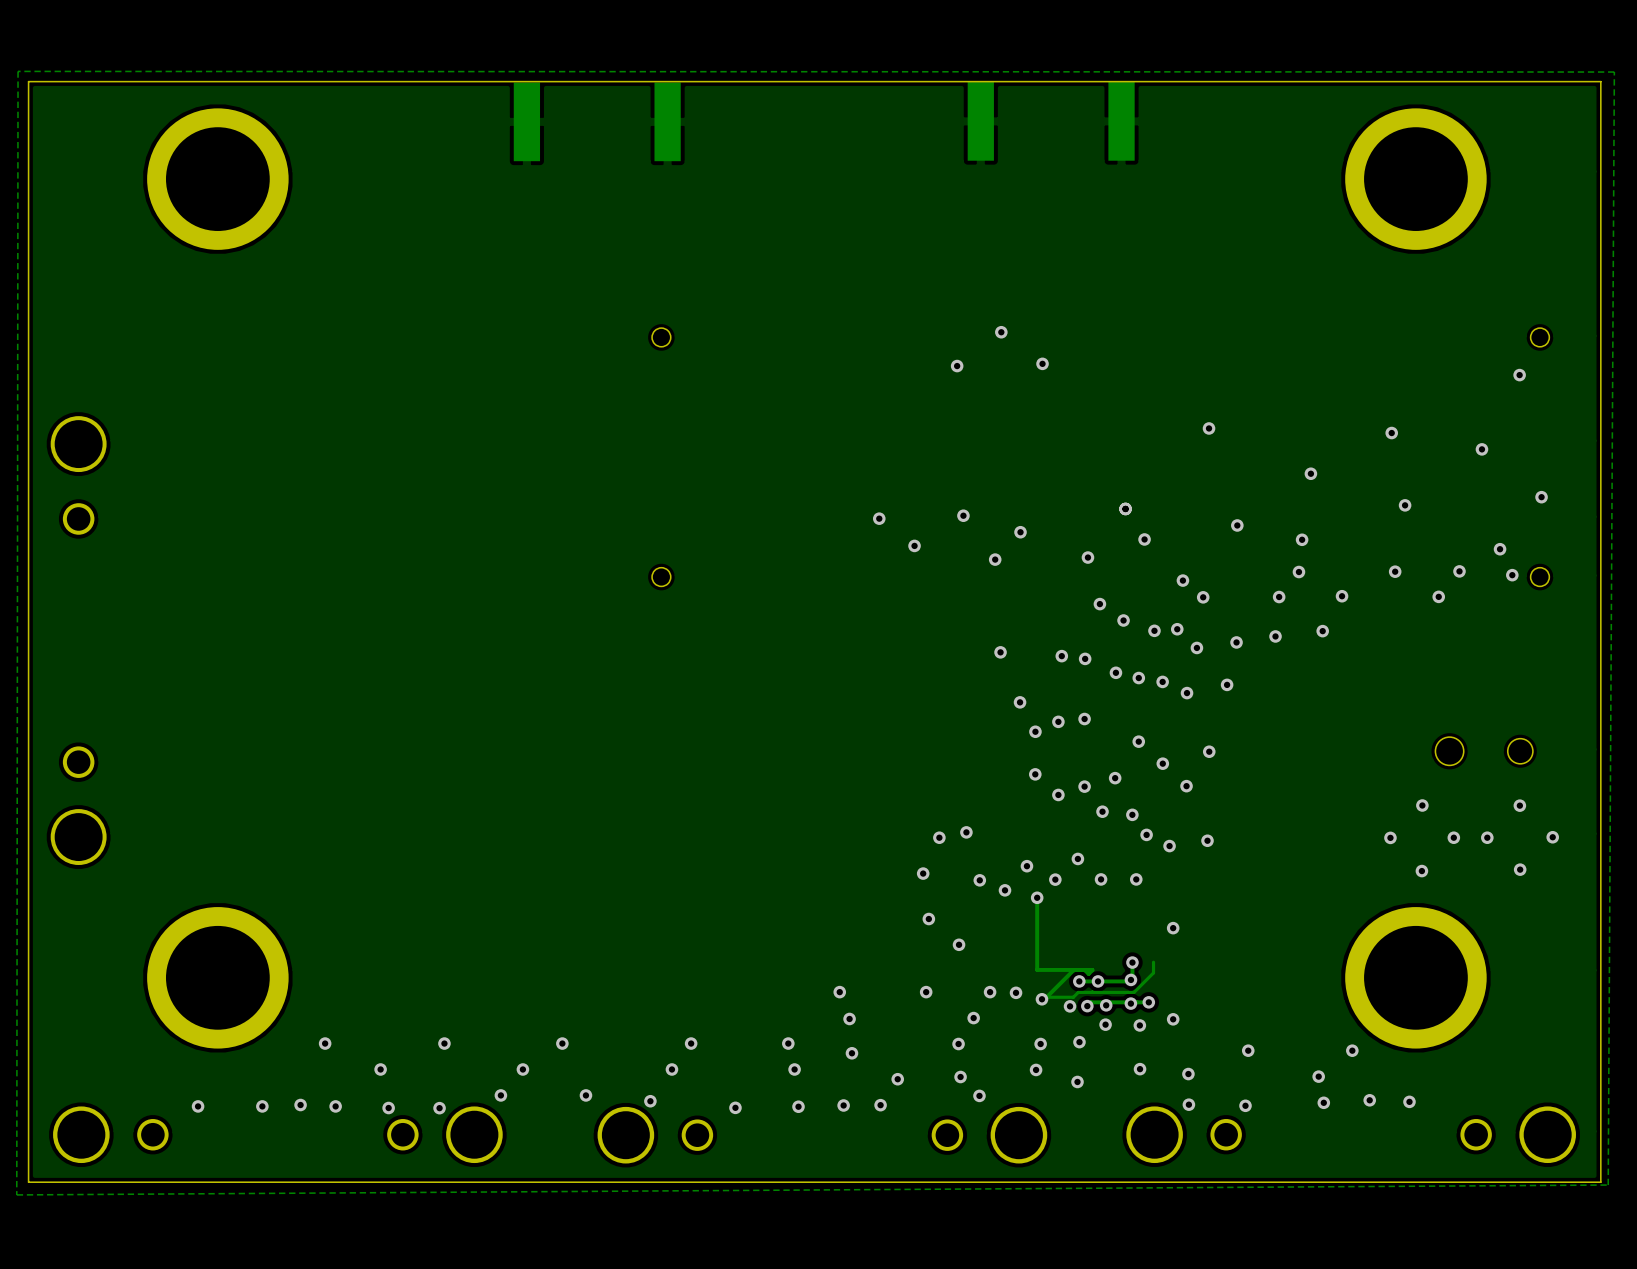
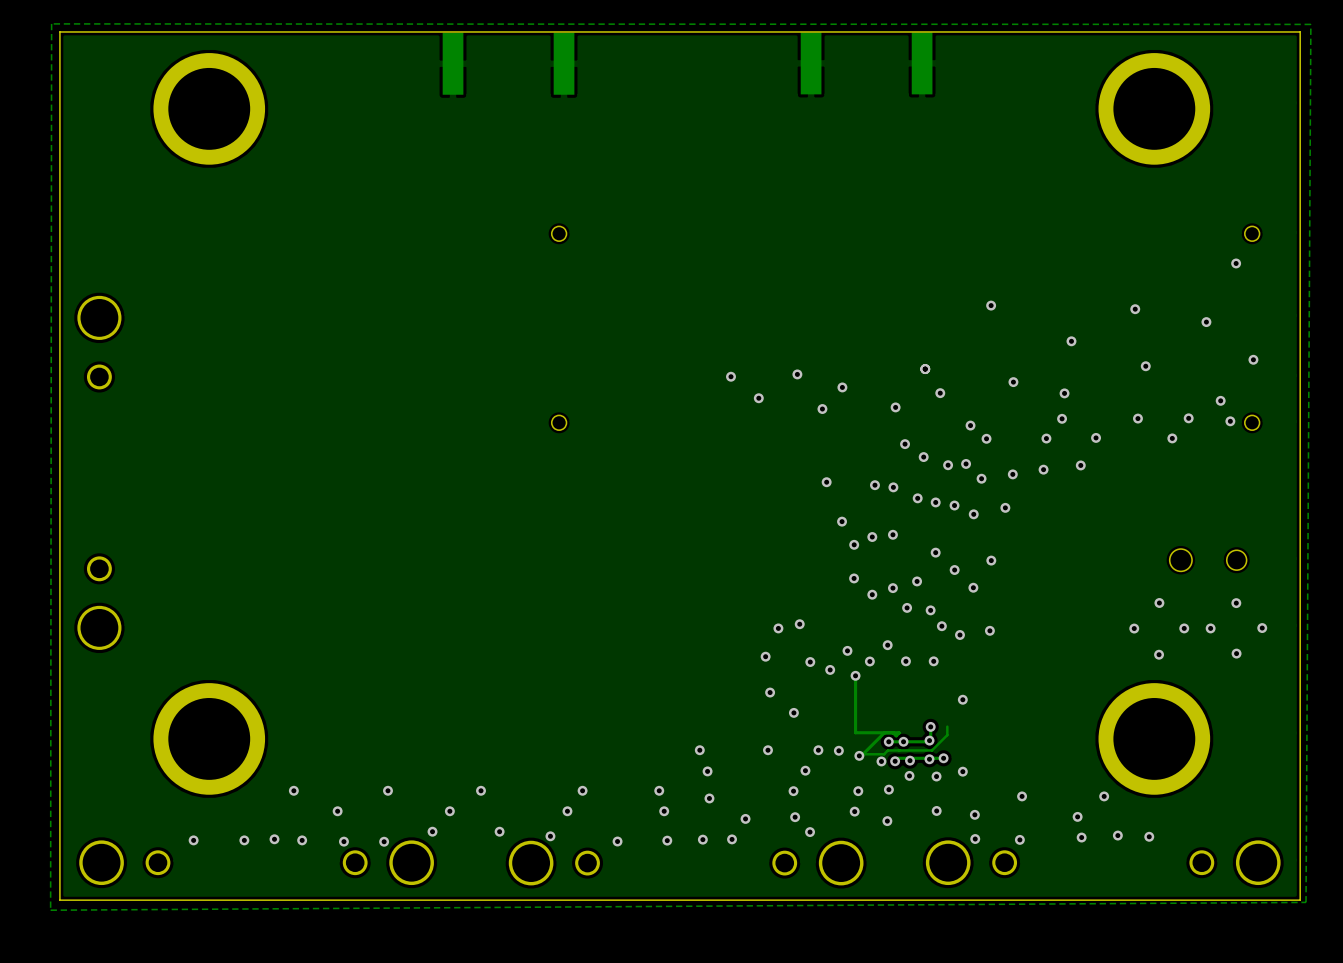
via: (1001, 332) -> none
via: (1042, 363) -> none
via: (957, 366) -> none

